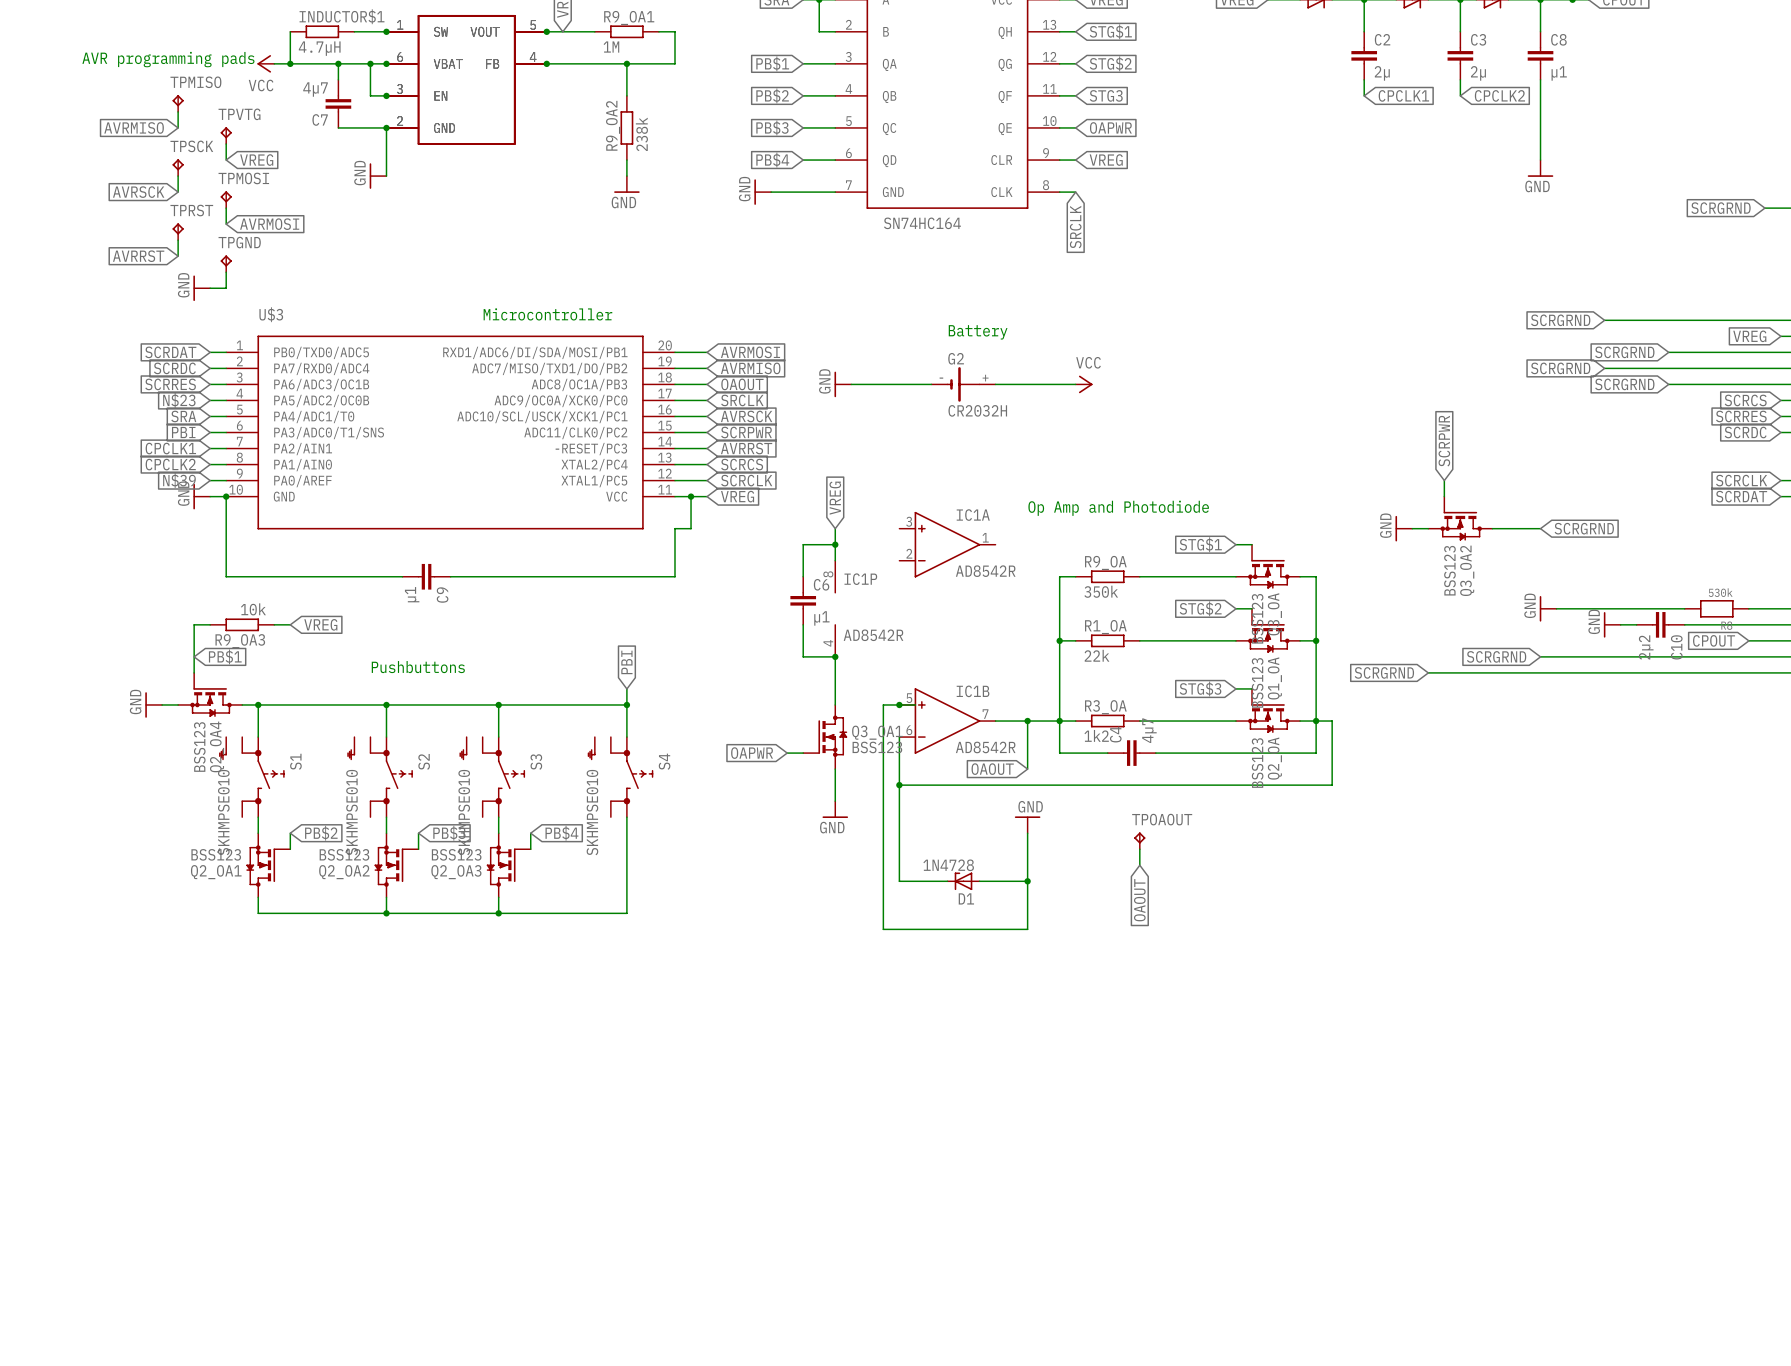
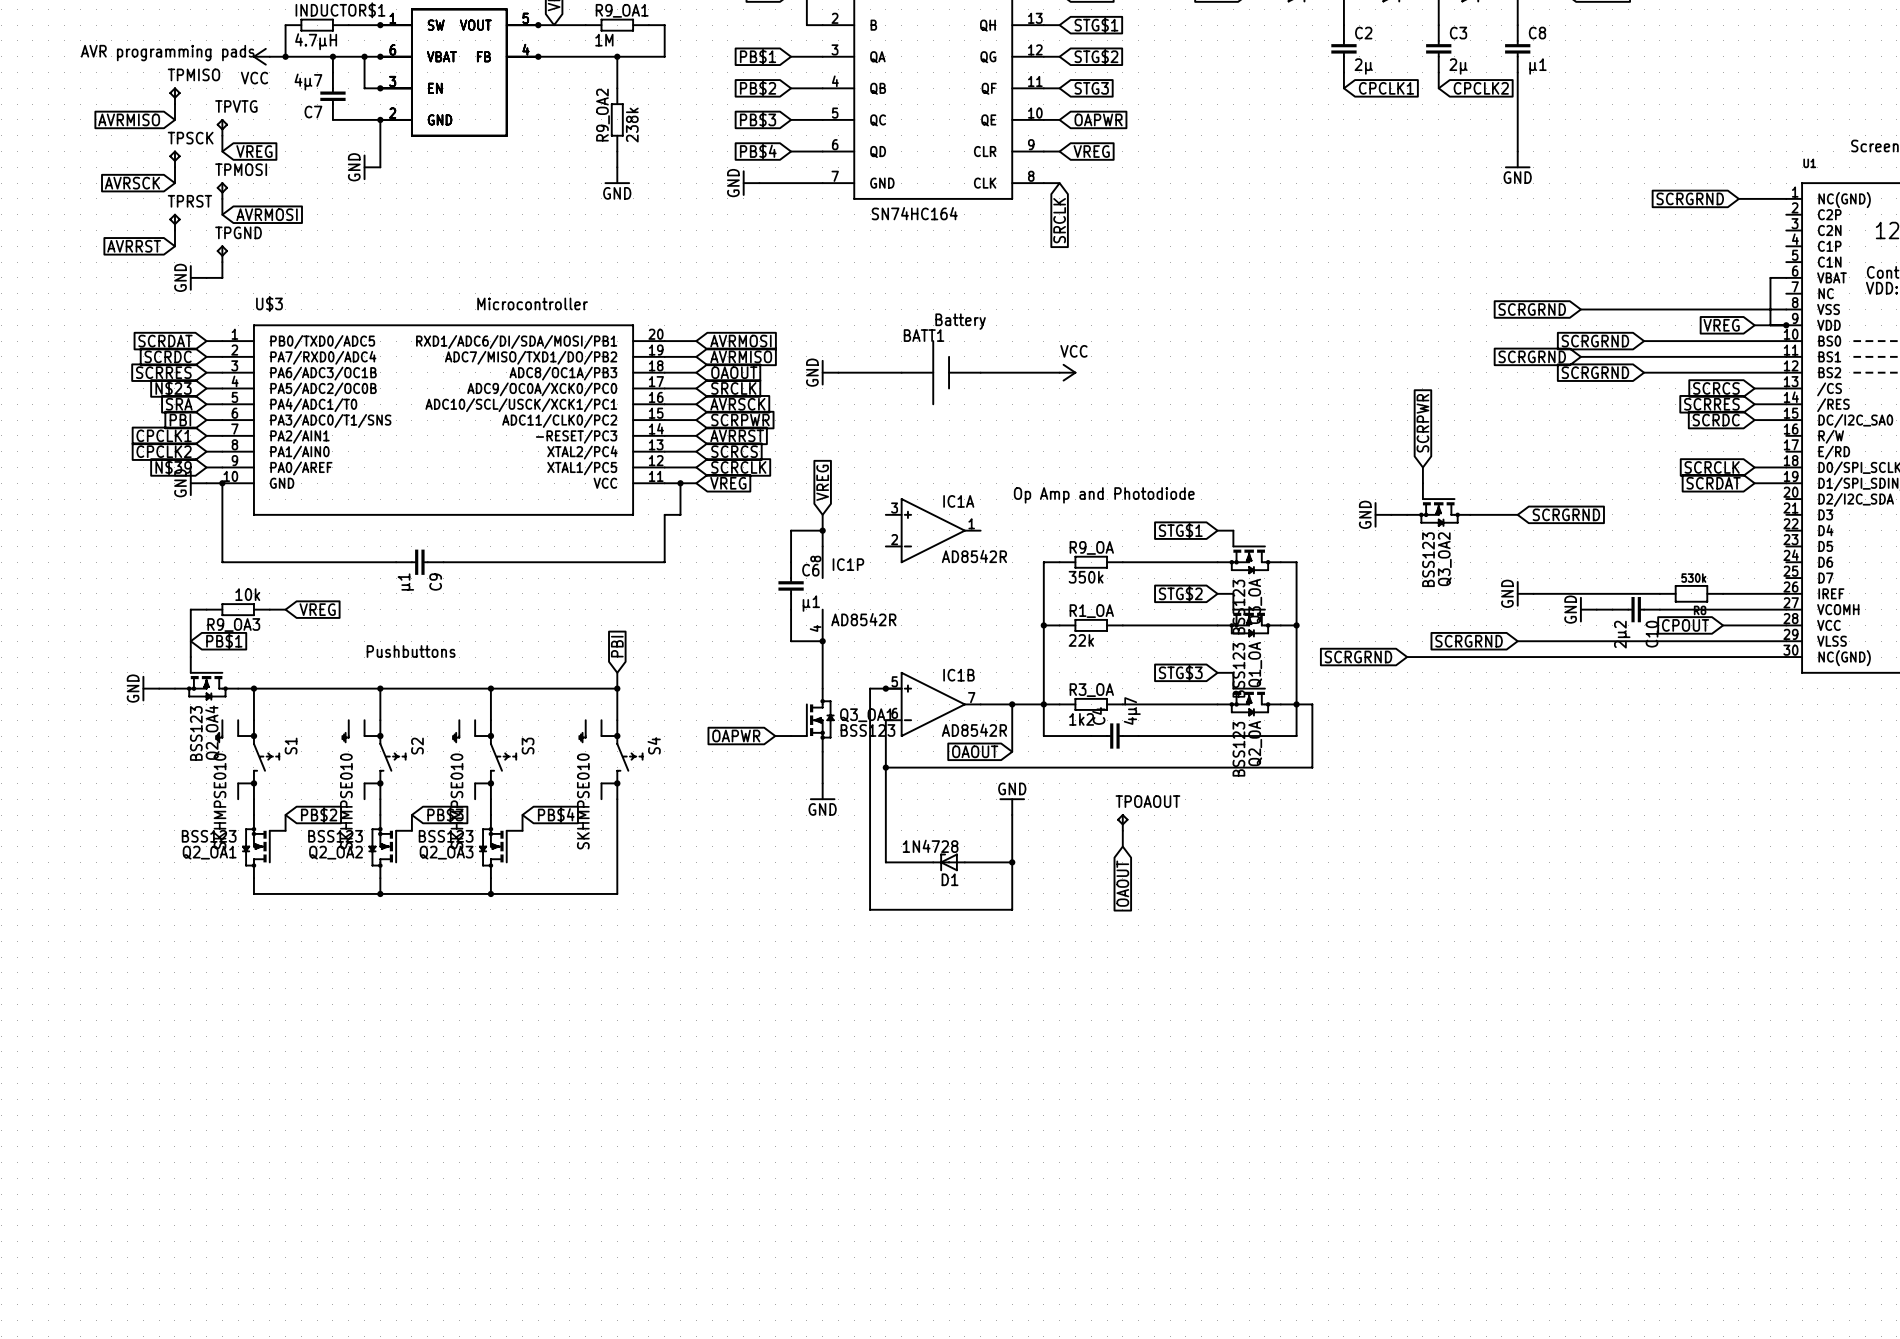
BATT1: none -> (941, 372)
G2: CR2032H (963, 384) -> none

